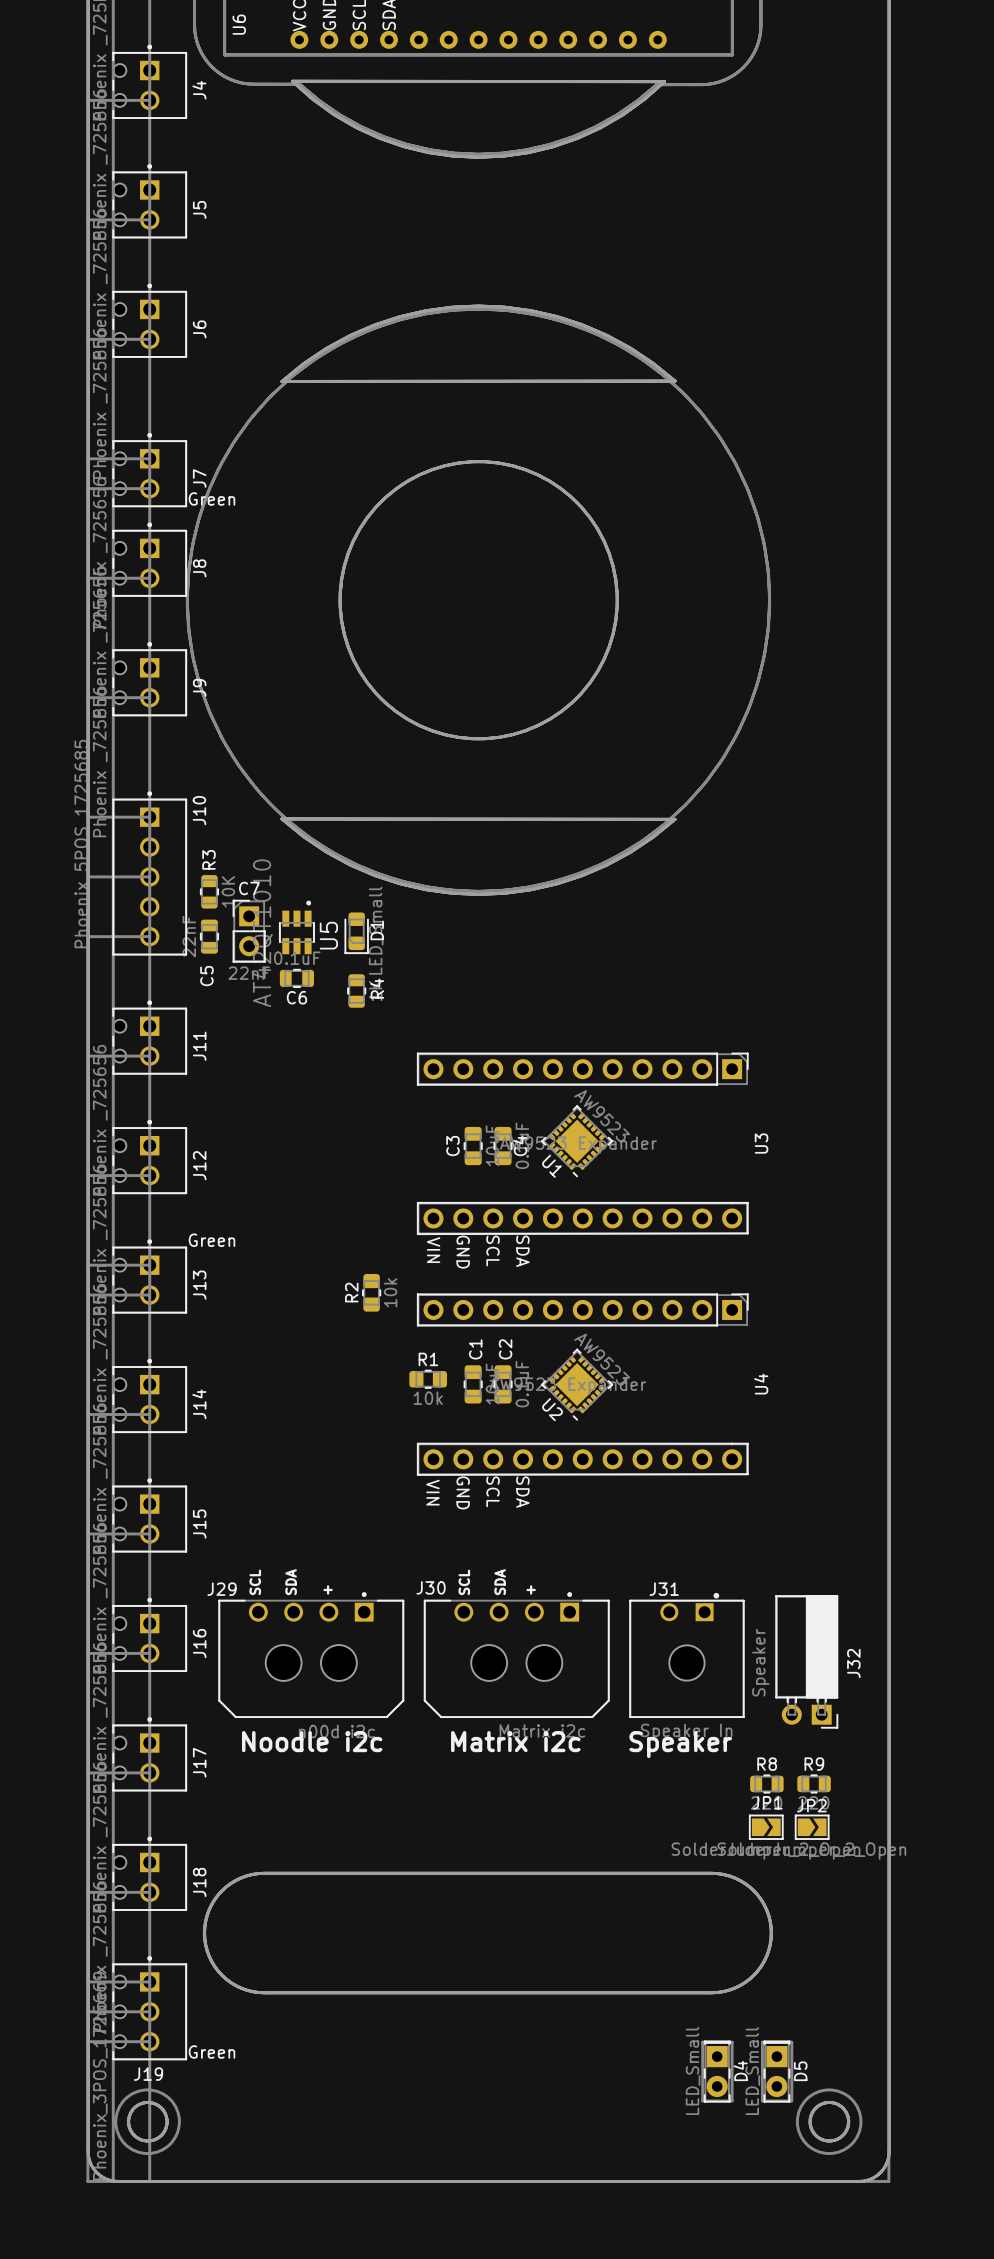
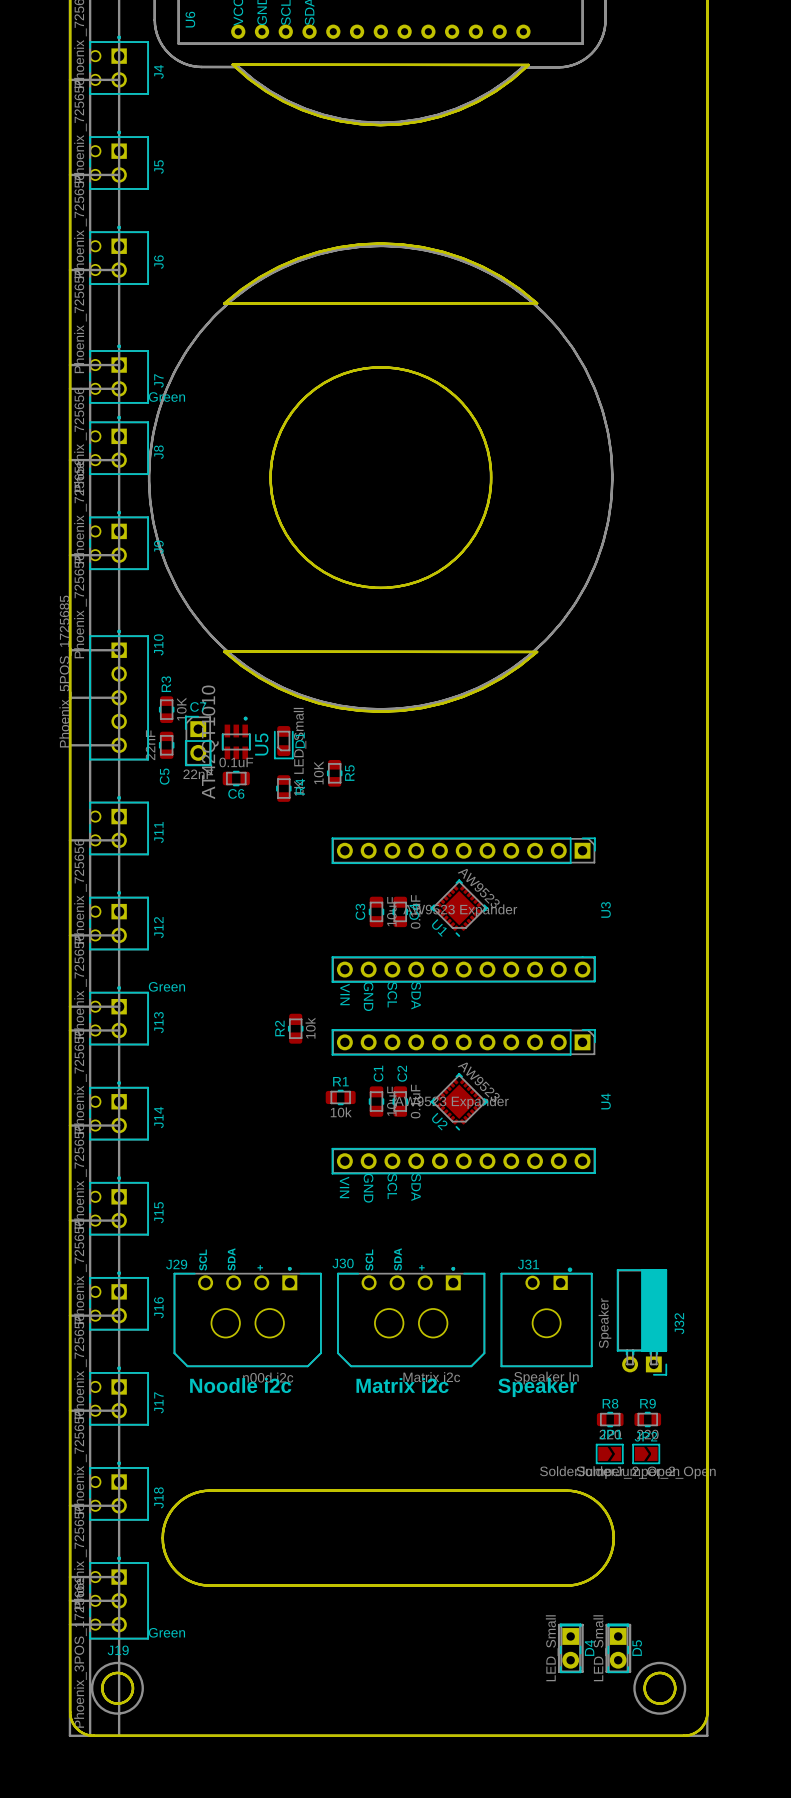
R5: none -> 10K (334, 773)

